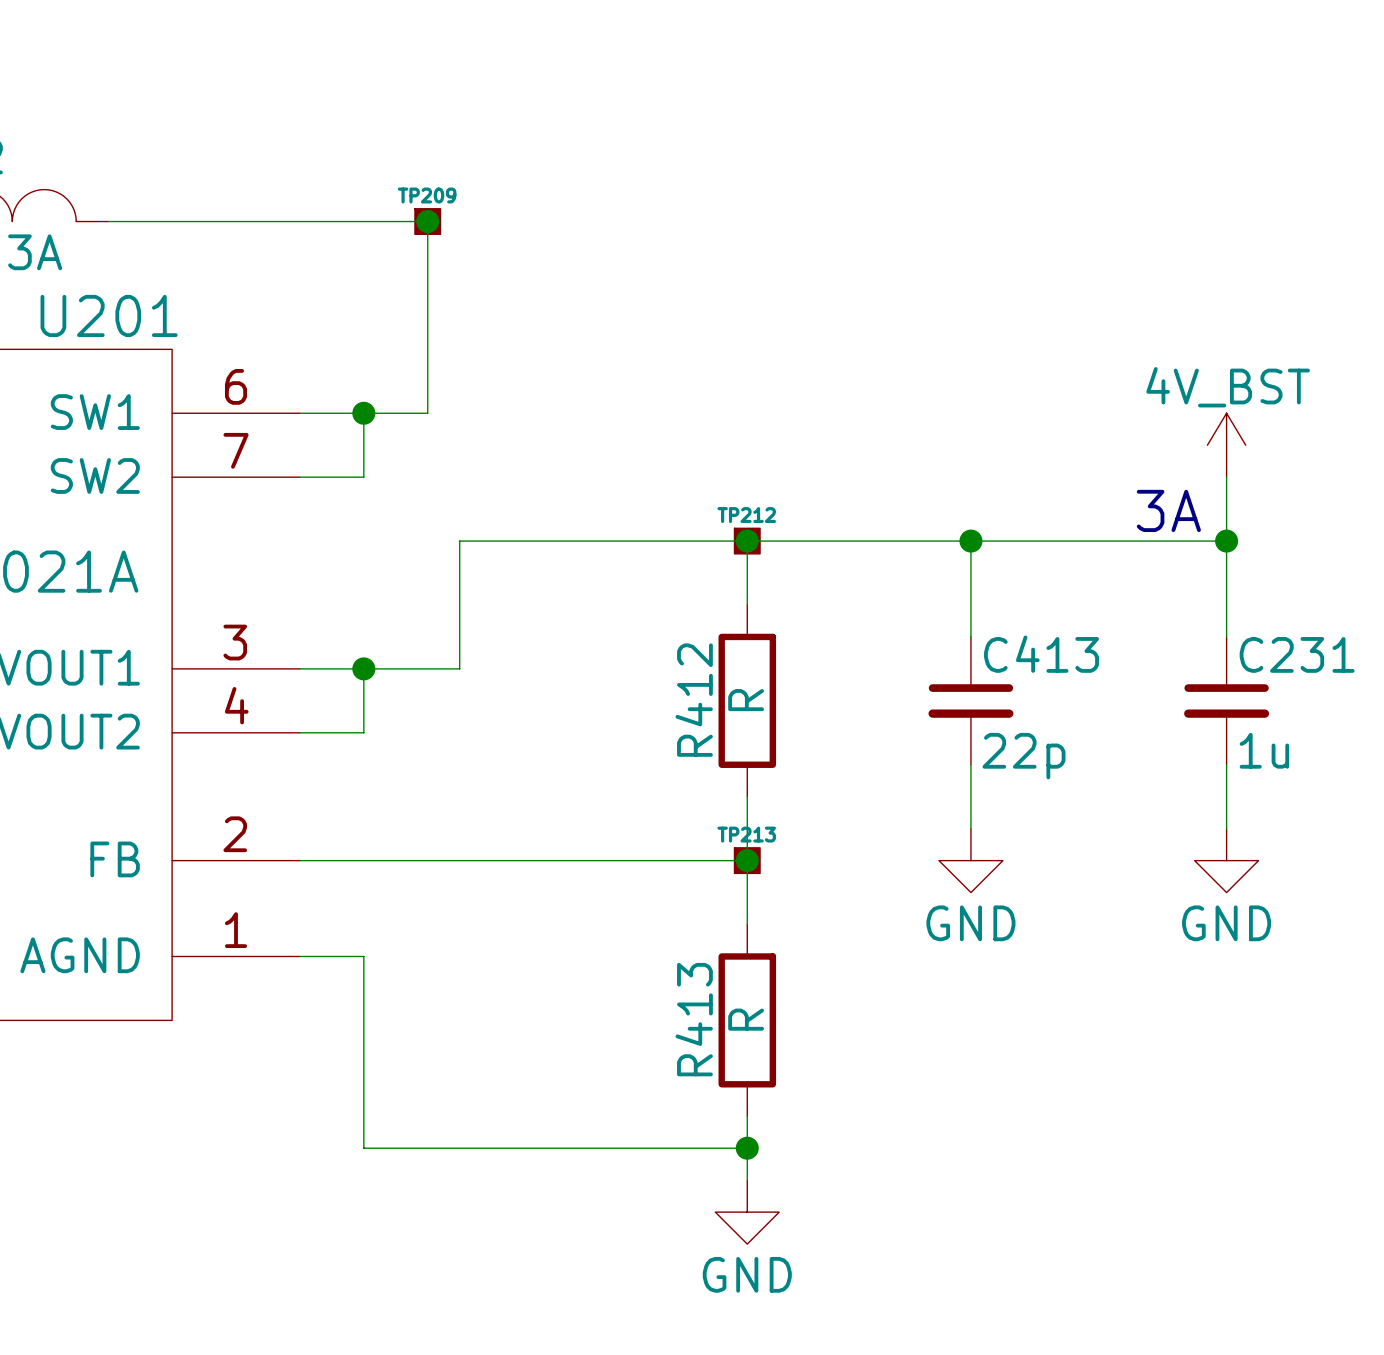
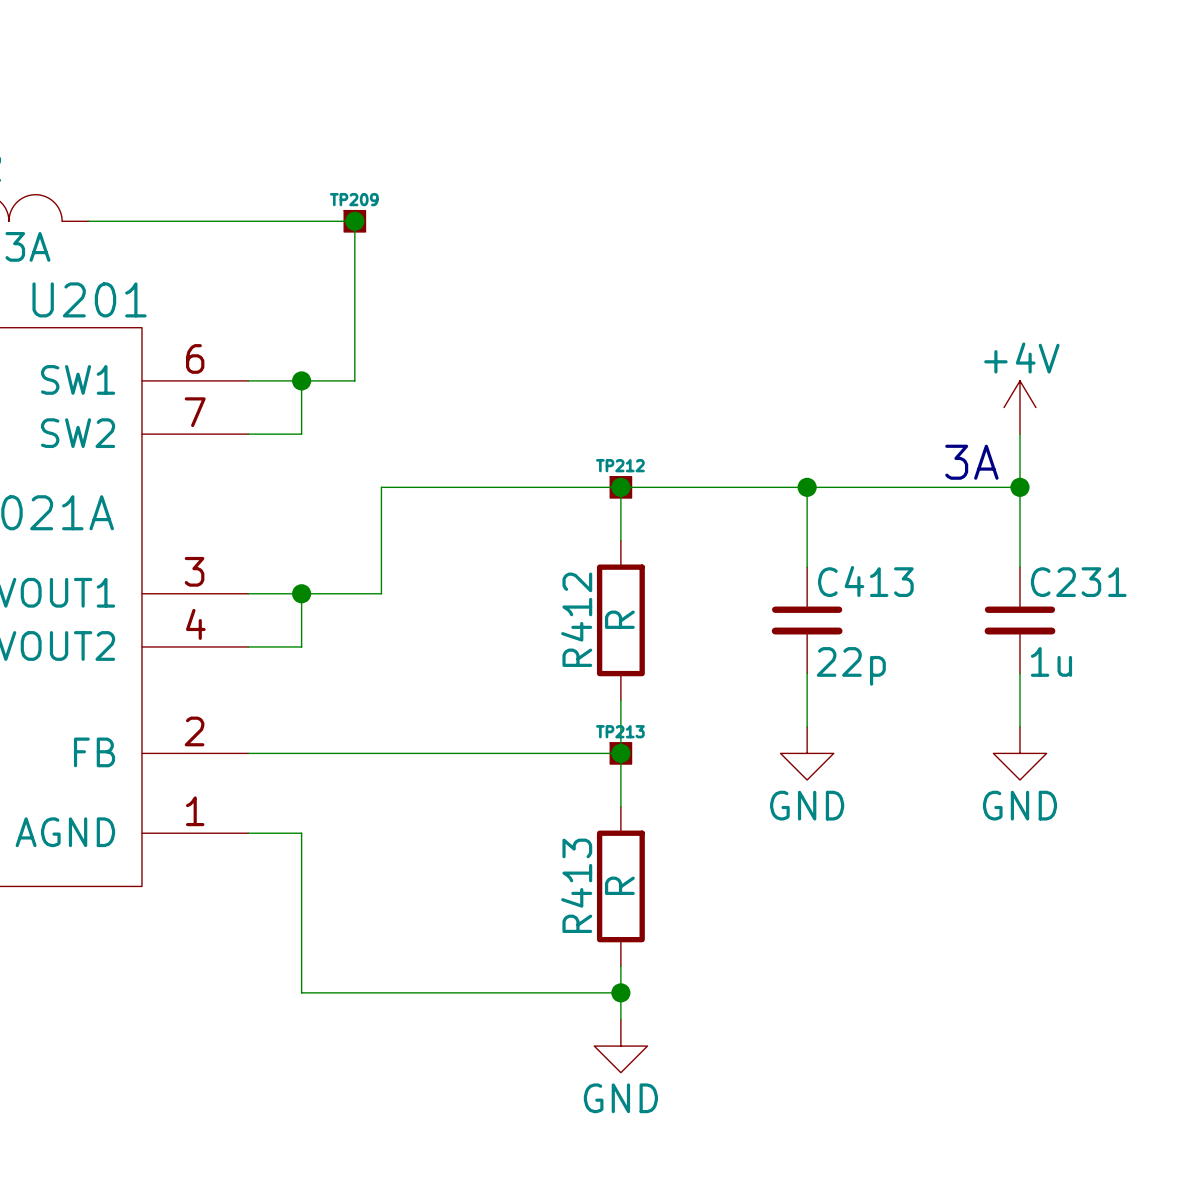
power symbol: 4V_BST (1226, 445) -> +4V (1019, 407)

